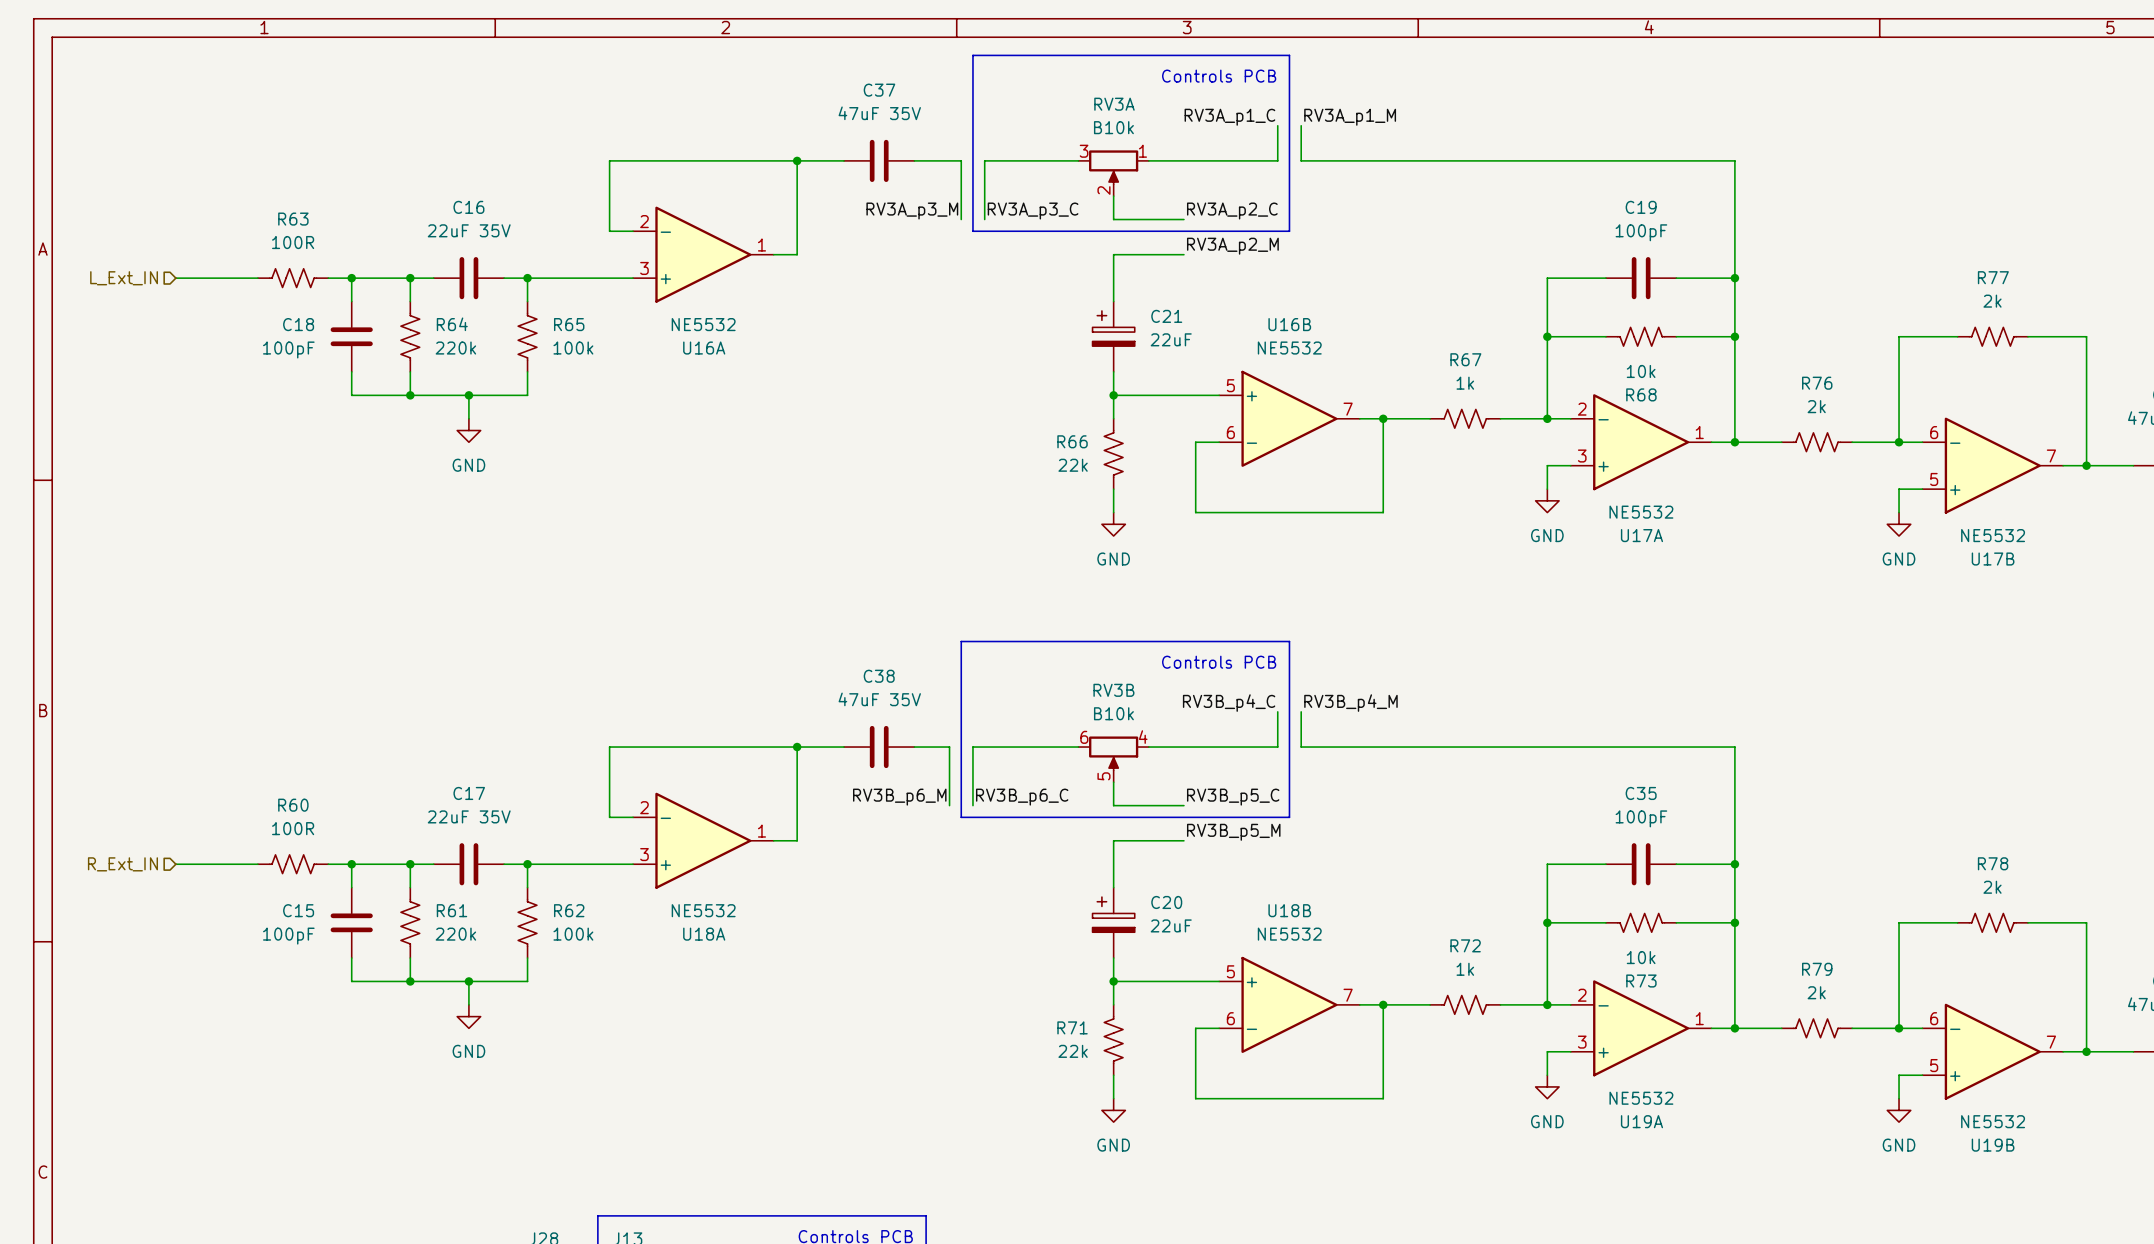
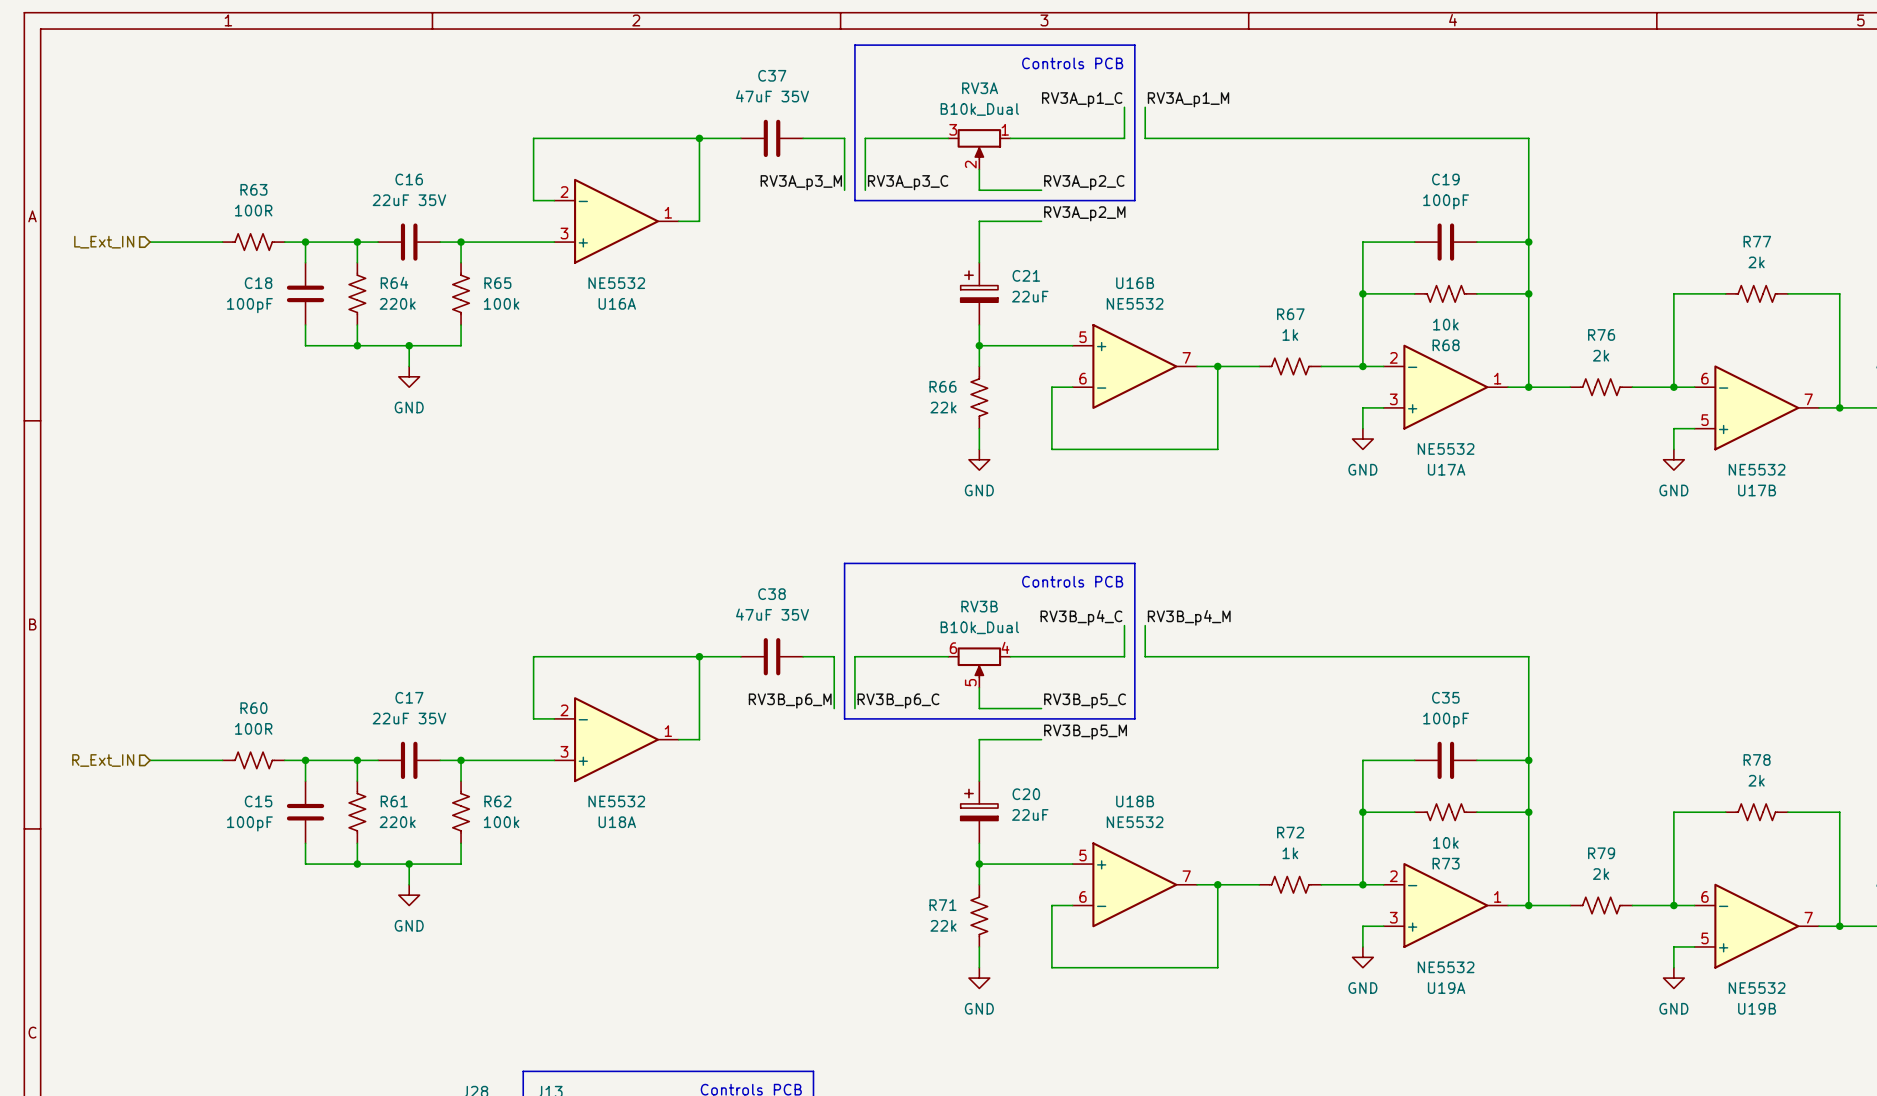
RV3A value: B10k (1113, 127) -> B10k_Dual (979, 109)
RV3B value: B10k (1113, 713) -> B10k_Dual (979, 627)

